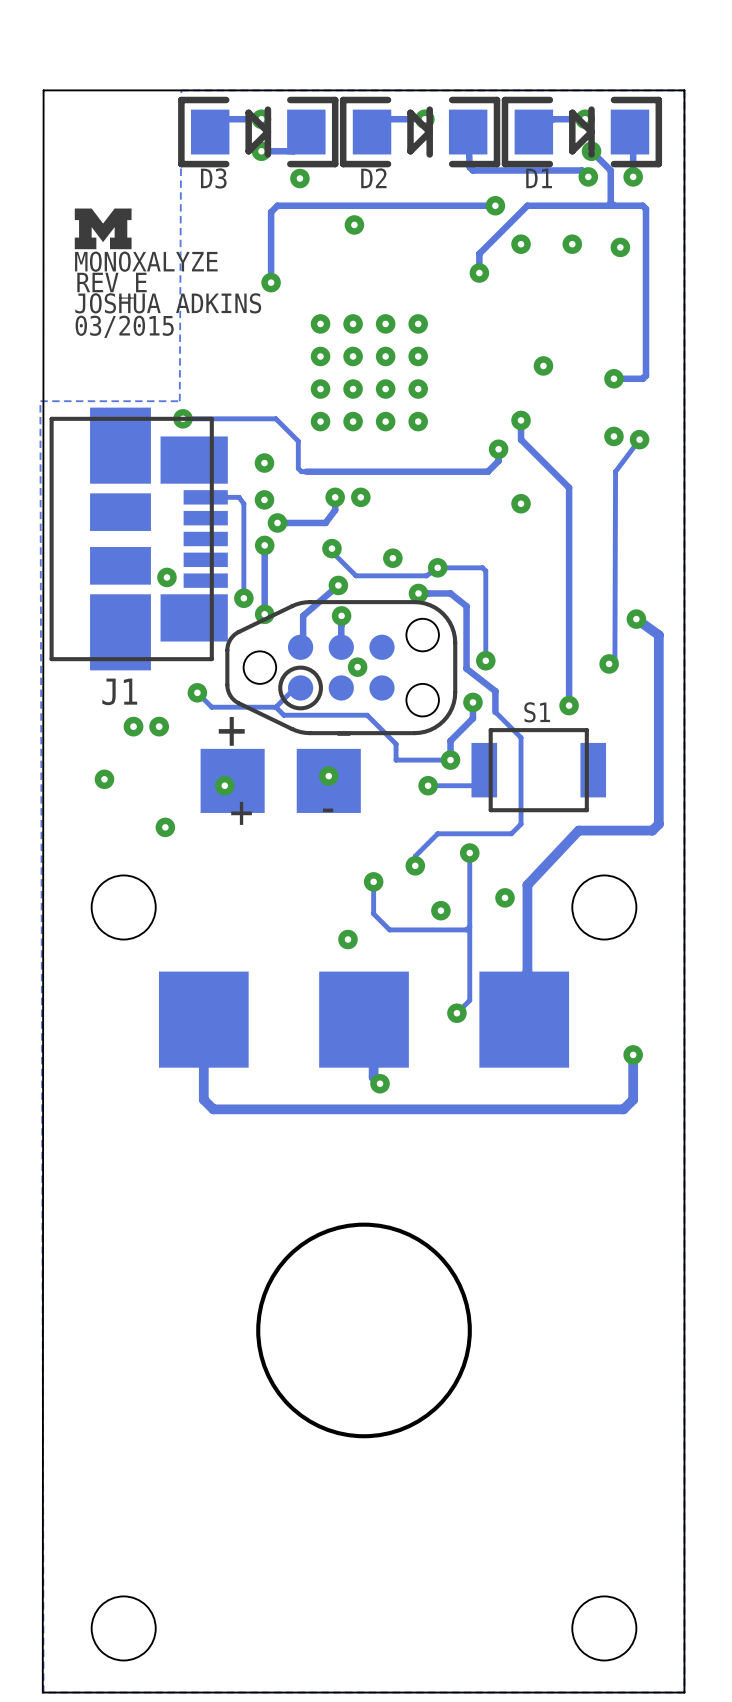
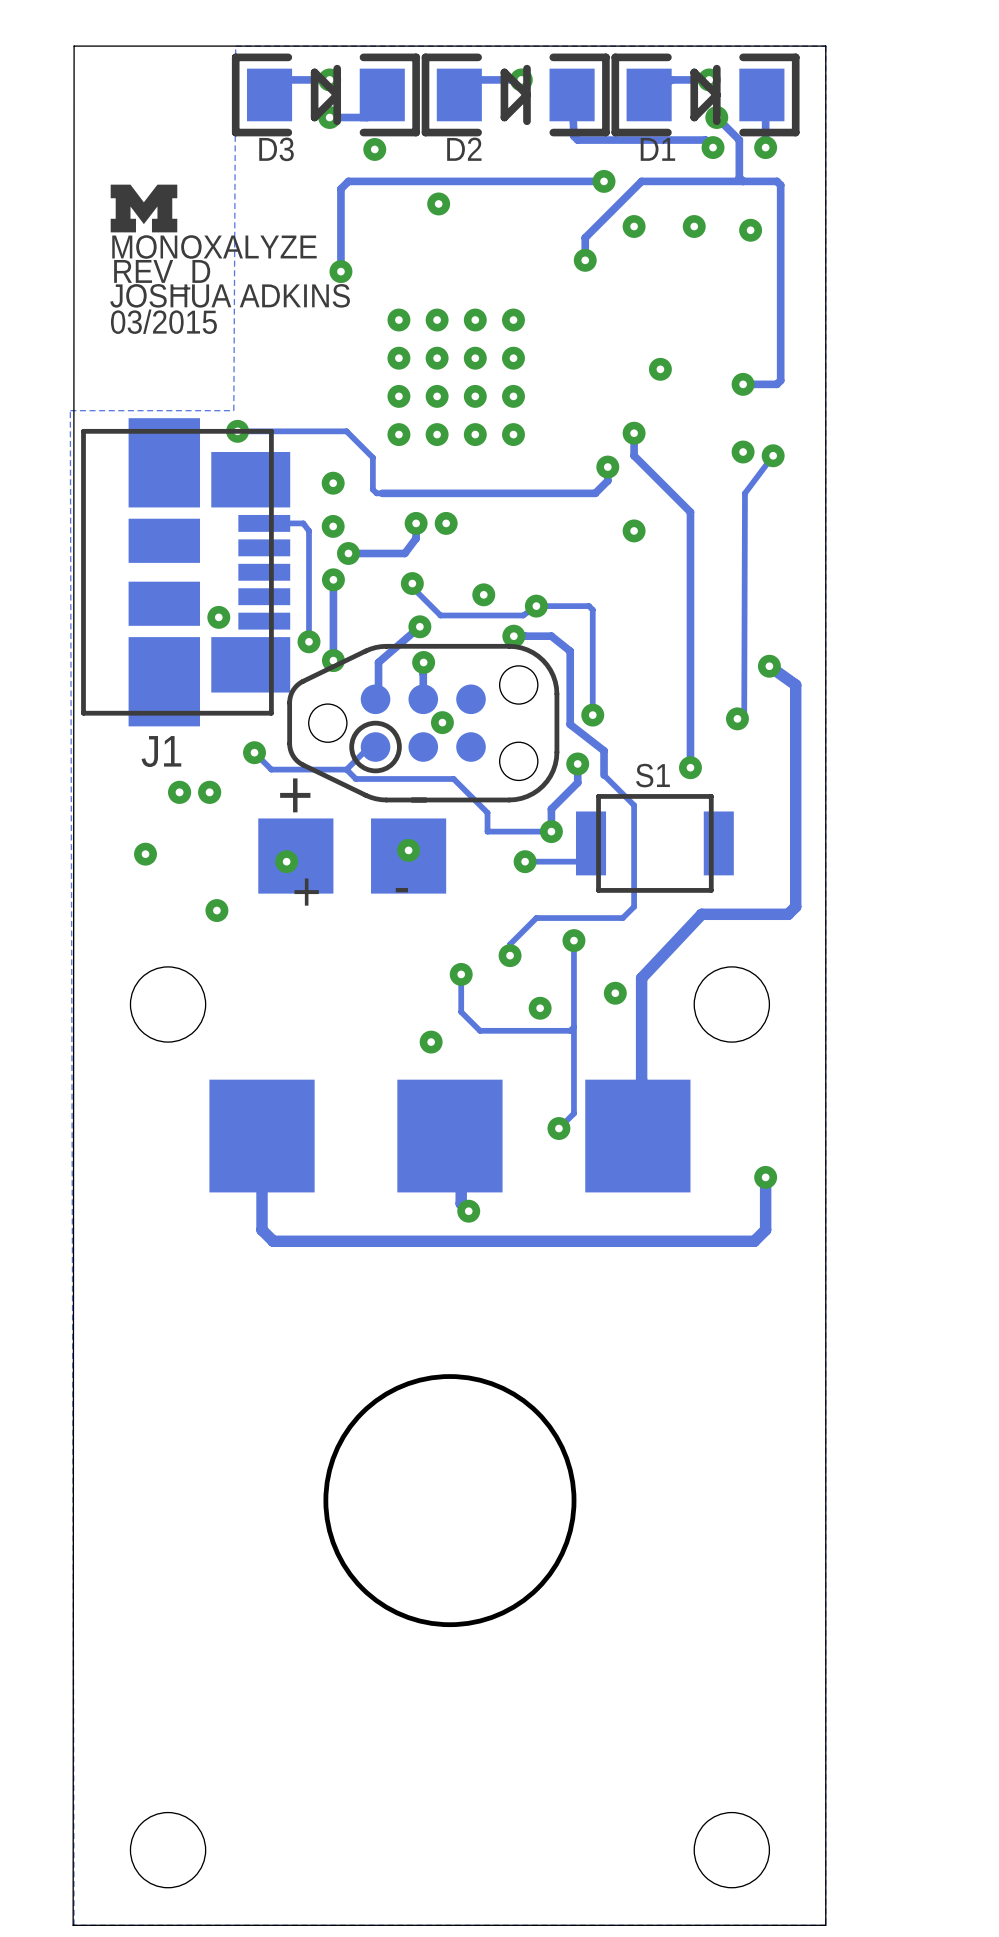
text: REV_E (112, 285) -> REV_D (162, 274)

